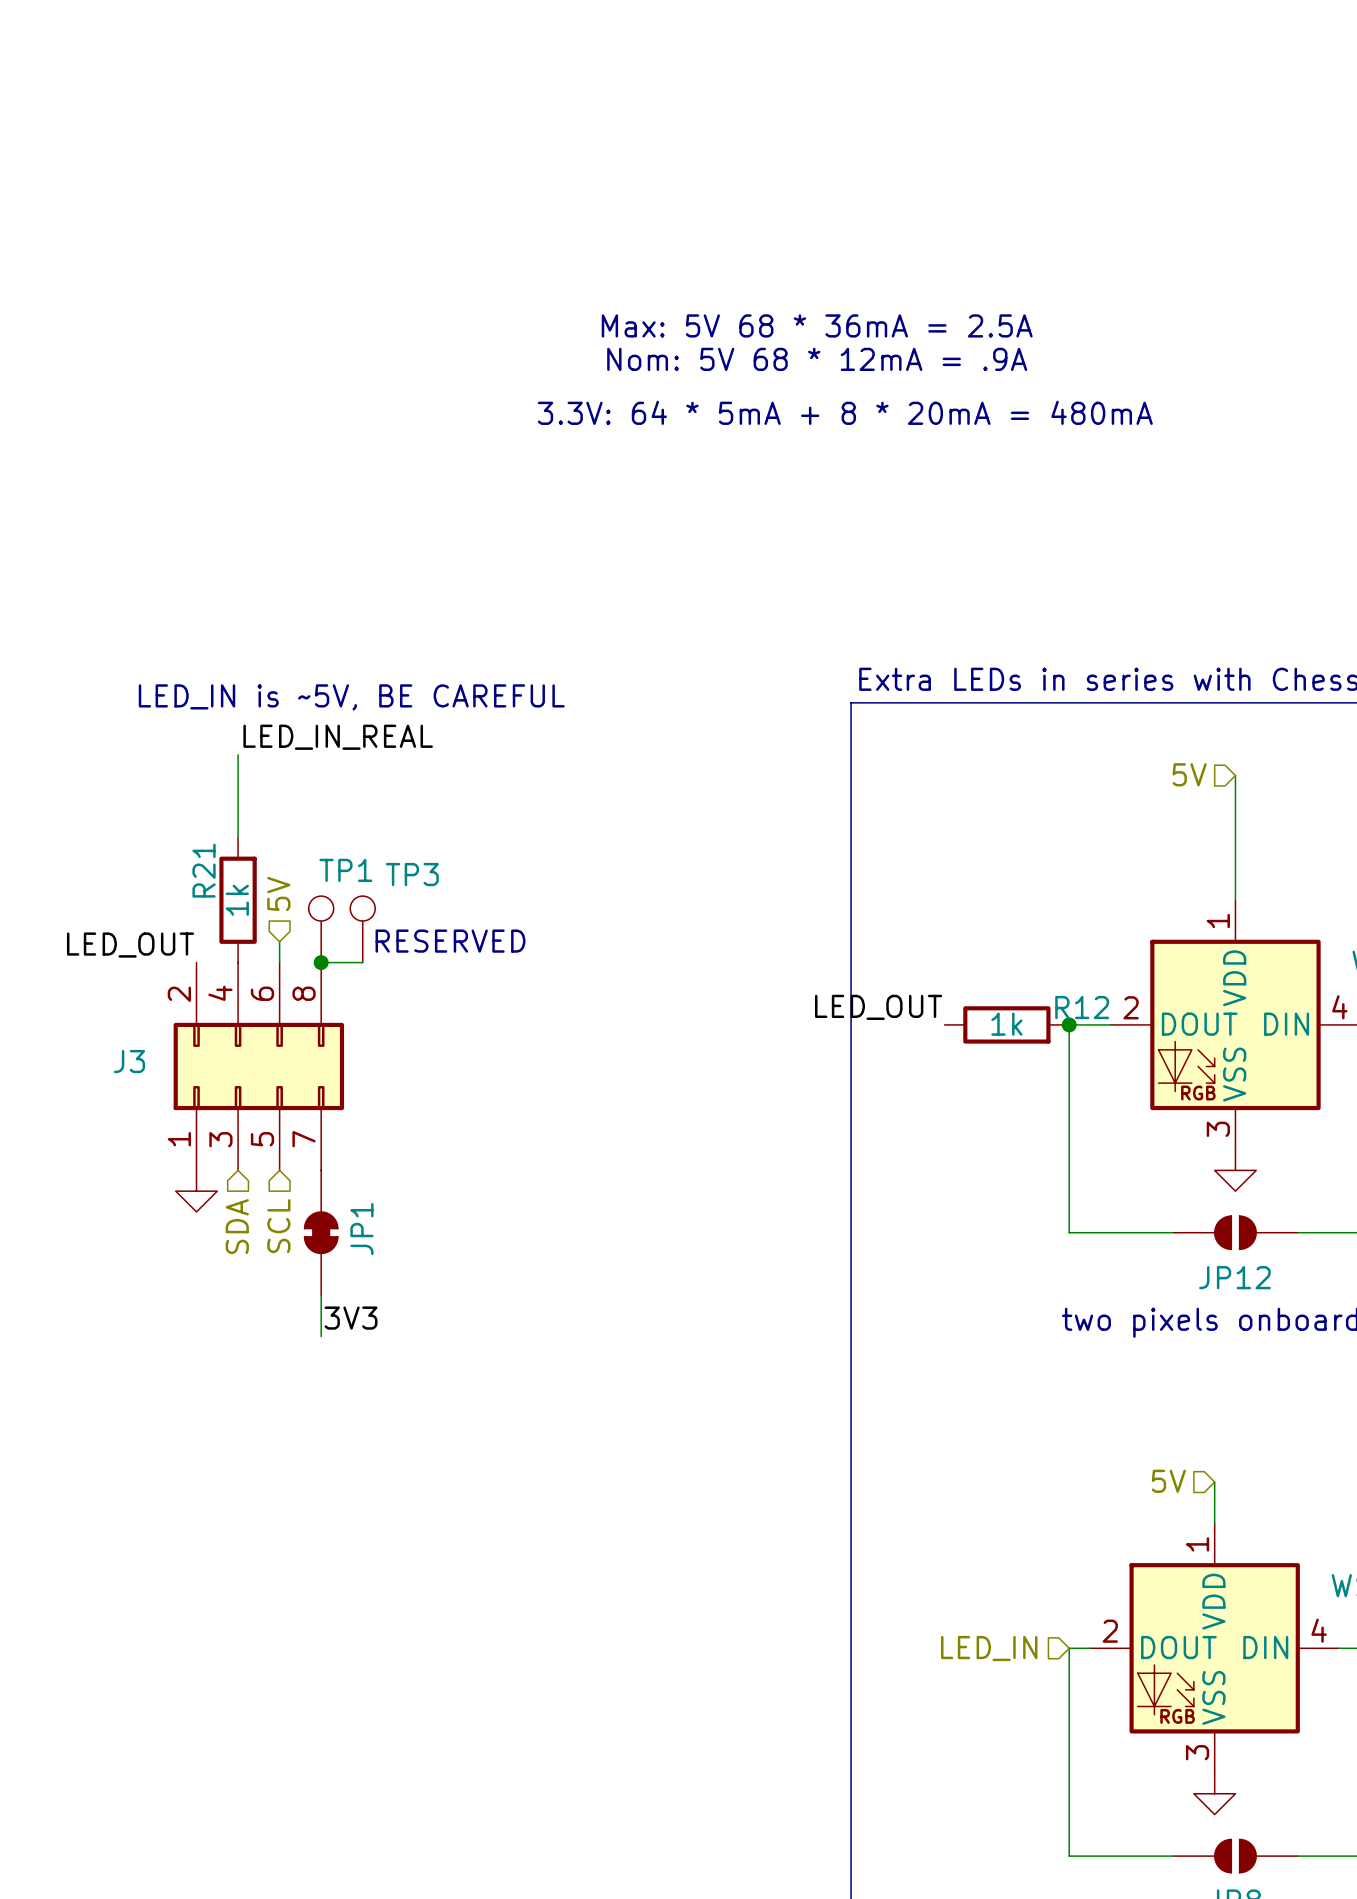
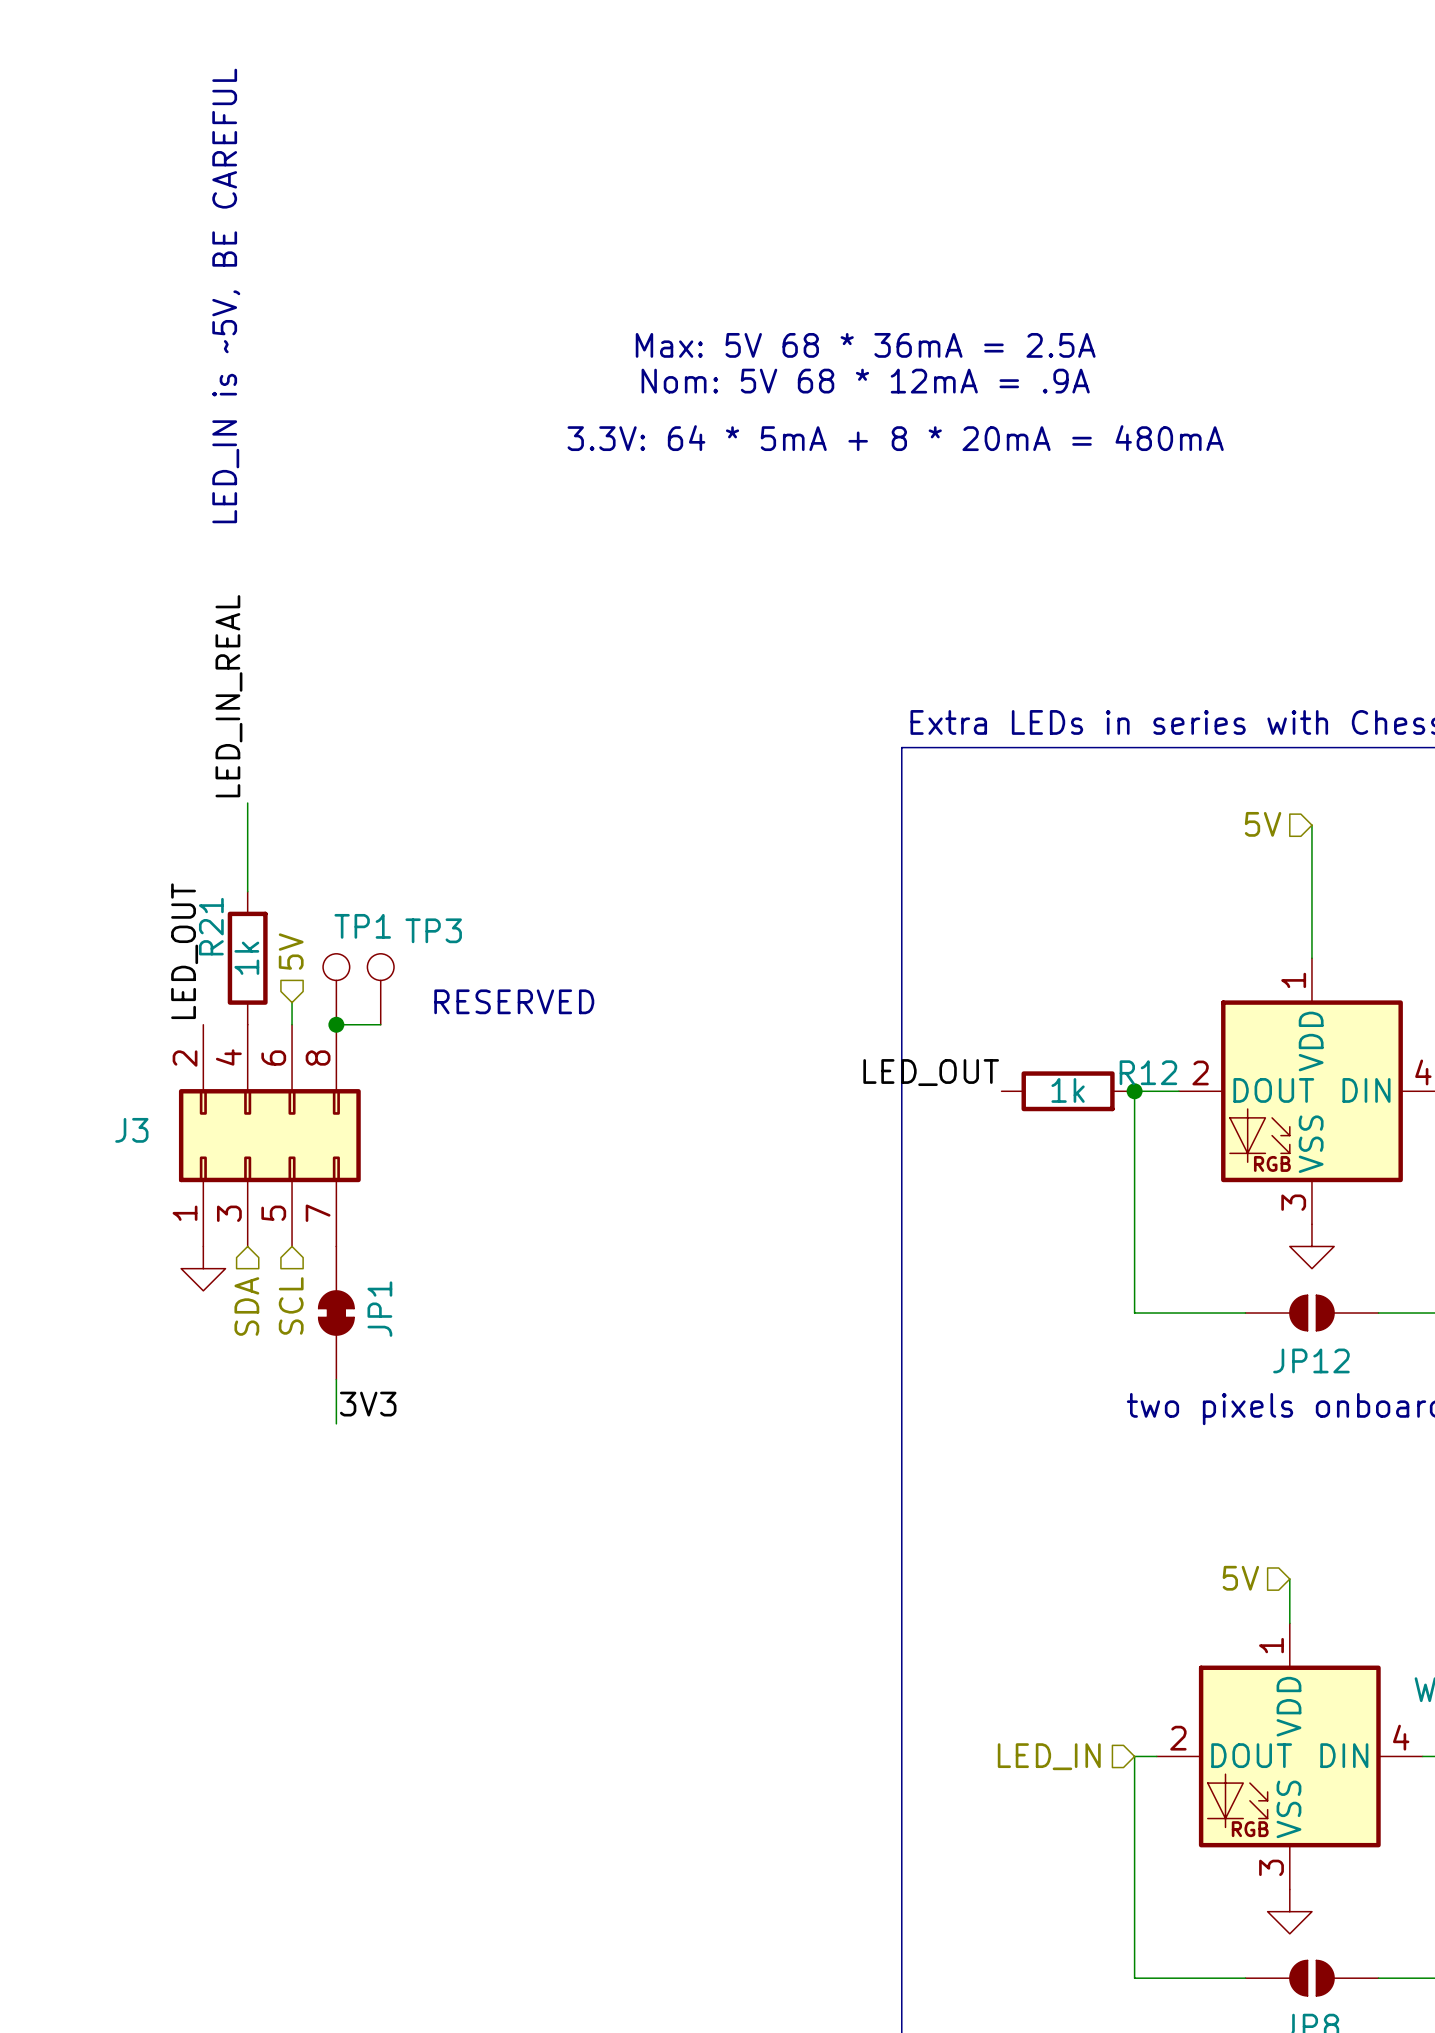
text: none -> LED_IN is ~5V, BE CAREFUL (226, 295)
text: LED_IN is ~5V, BE CAREFUL (351, 697) -> none
label rotation: 0° (338, 737) -> 90° counterclockwise (228, 696)
text position: RESERVED (450, 941) -> RESERVED (514, 1001)
label rotation: 0° (130, 945) -> 90° counterclockwise (184, 951)

